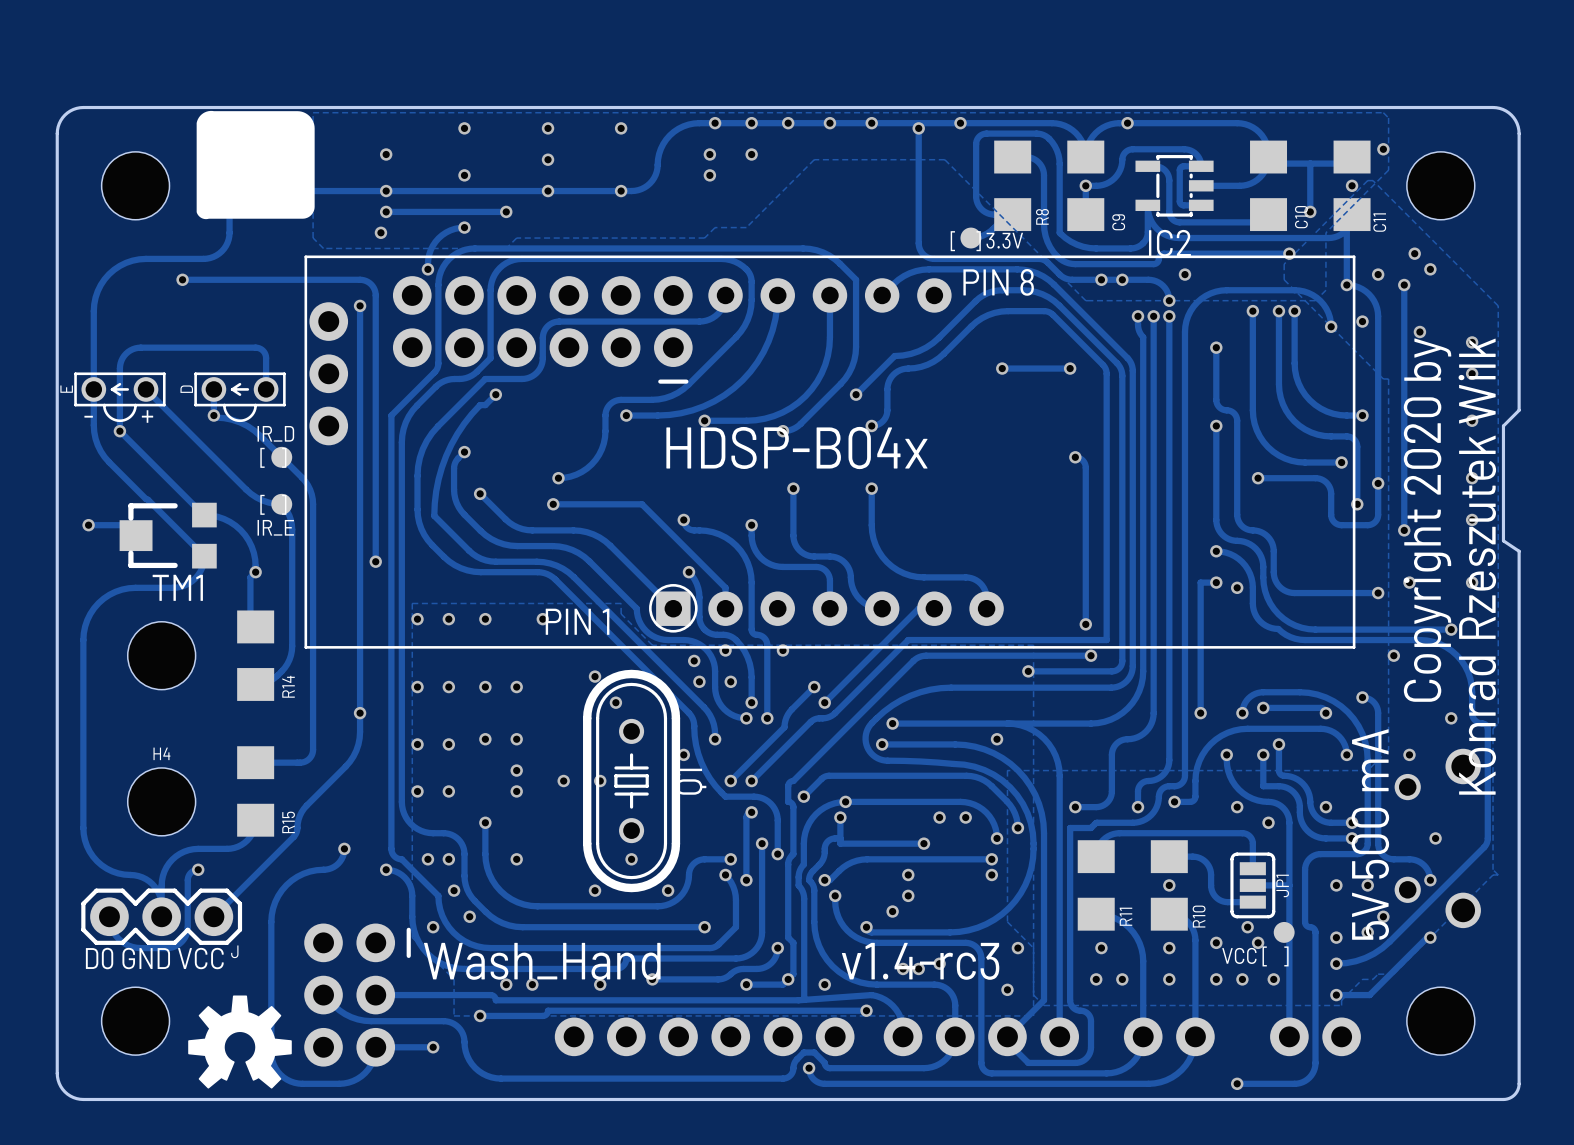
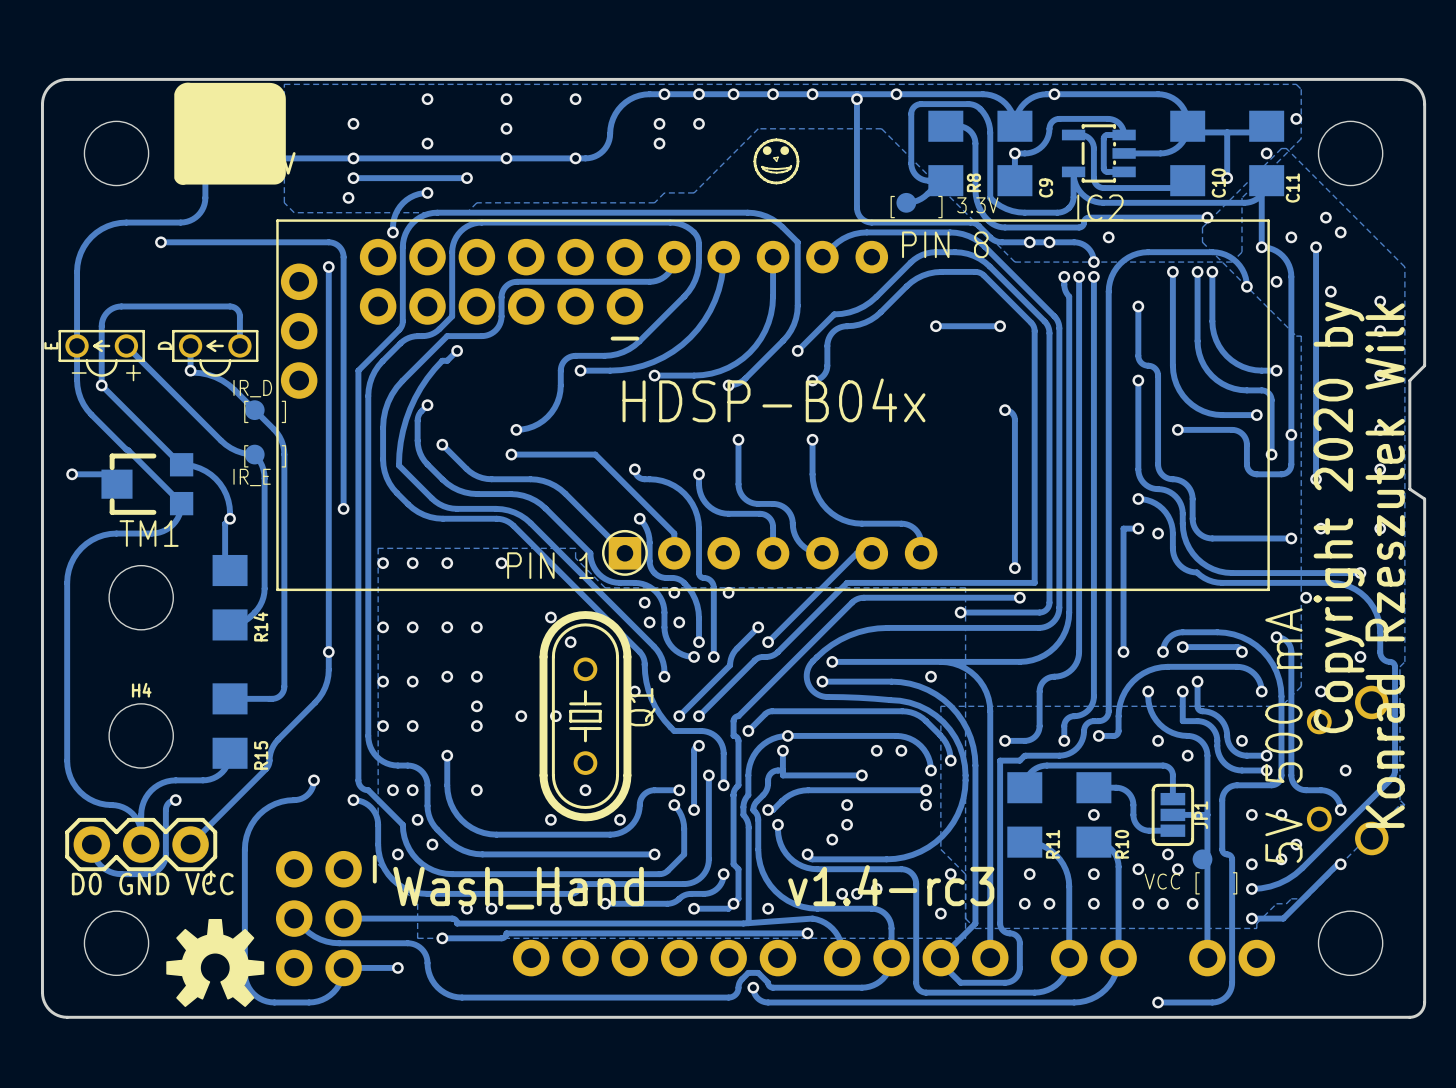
drawing: none -> [754, 139, 799, 184]

